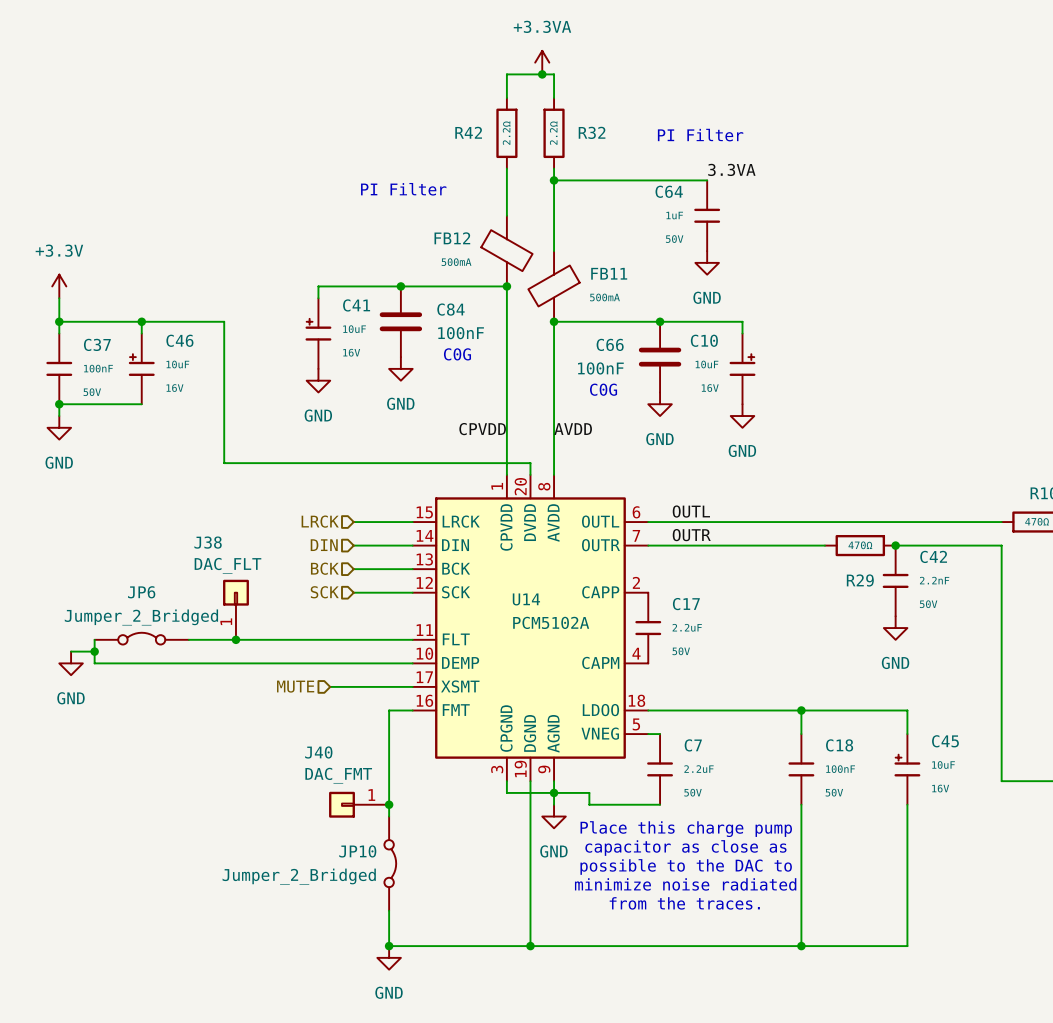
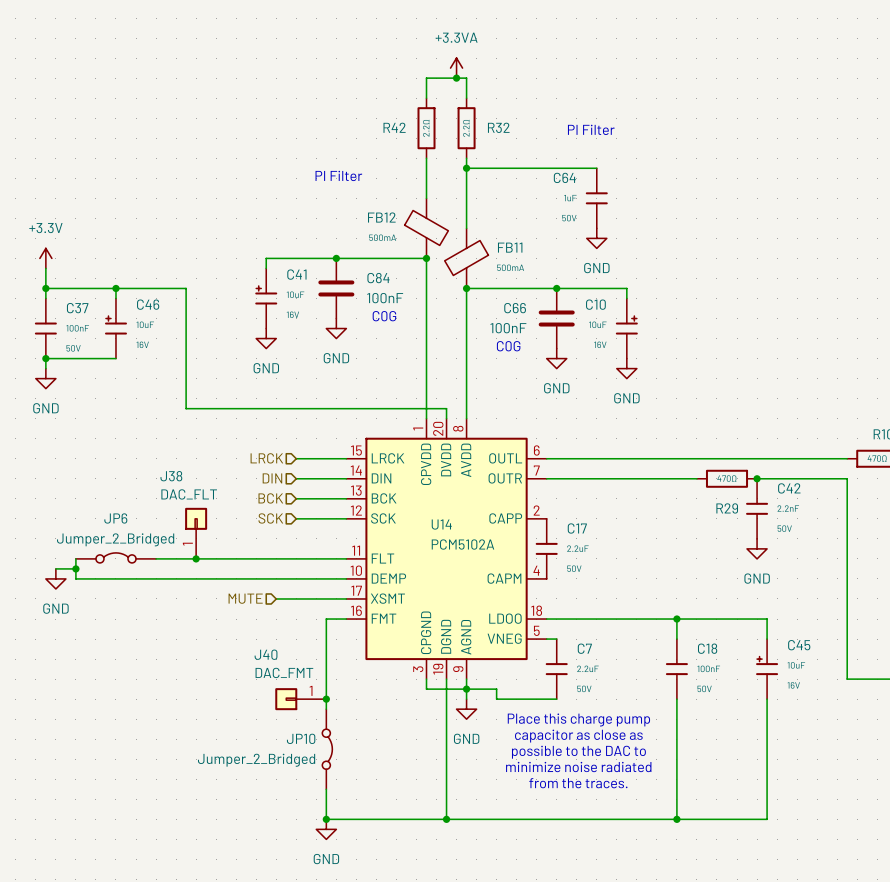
label: 3.3VA (731, 169) -> none
label: CPVDD (482, 429) -> none
label: AVDD (573, 429) -> none
label: OUTL (691, 511) -> none
label: OUTR (691, 535) -> none

